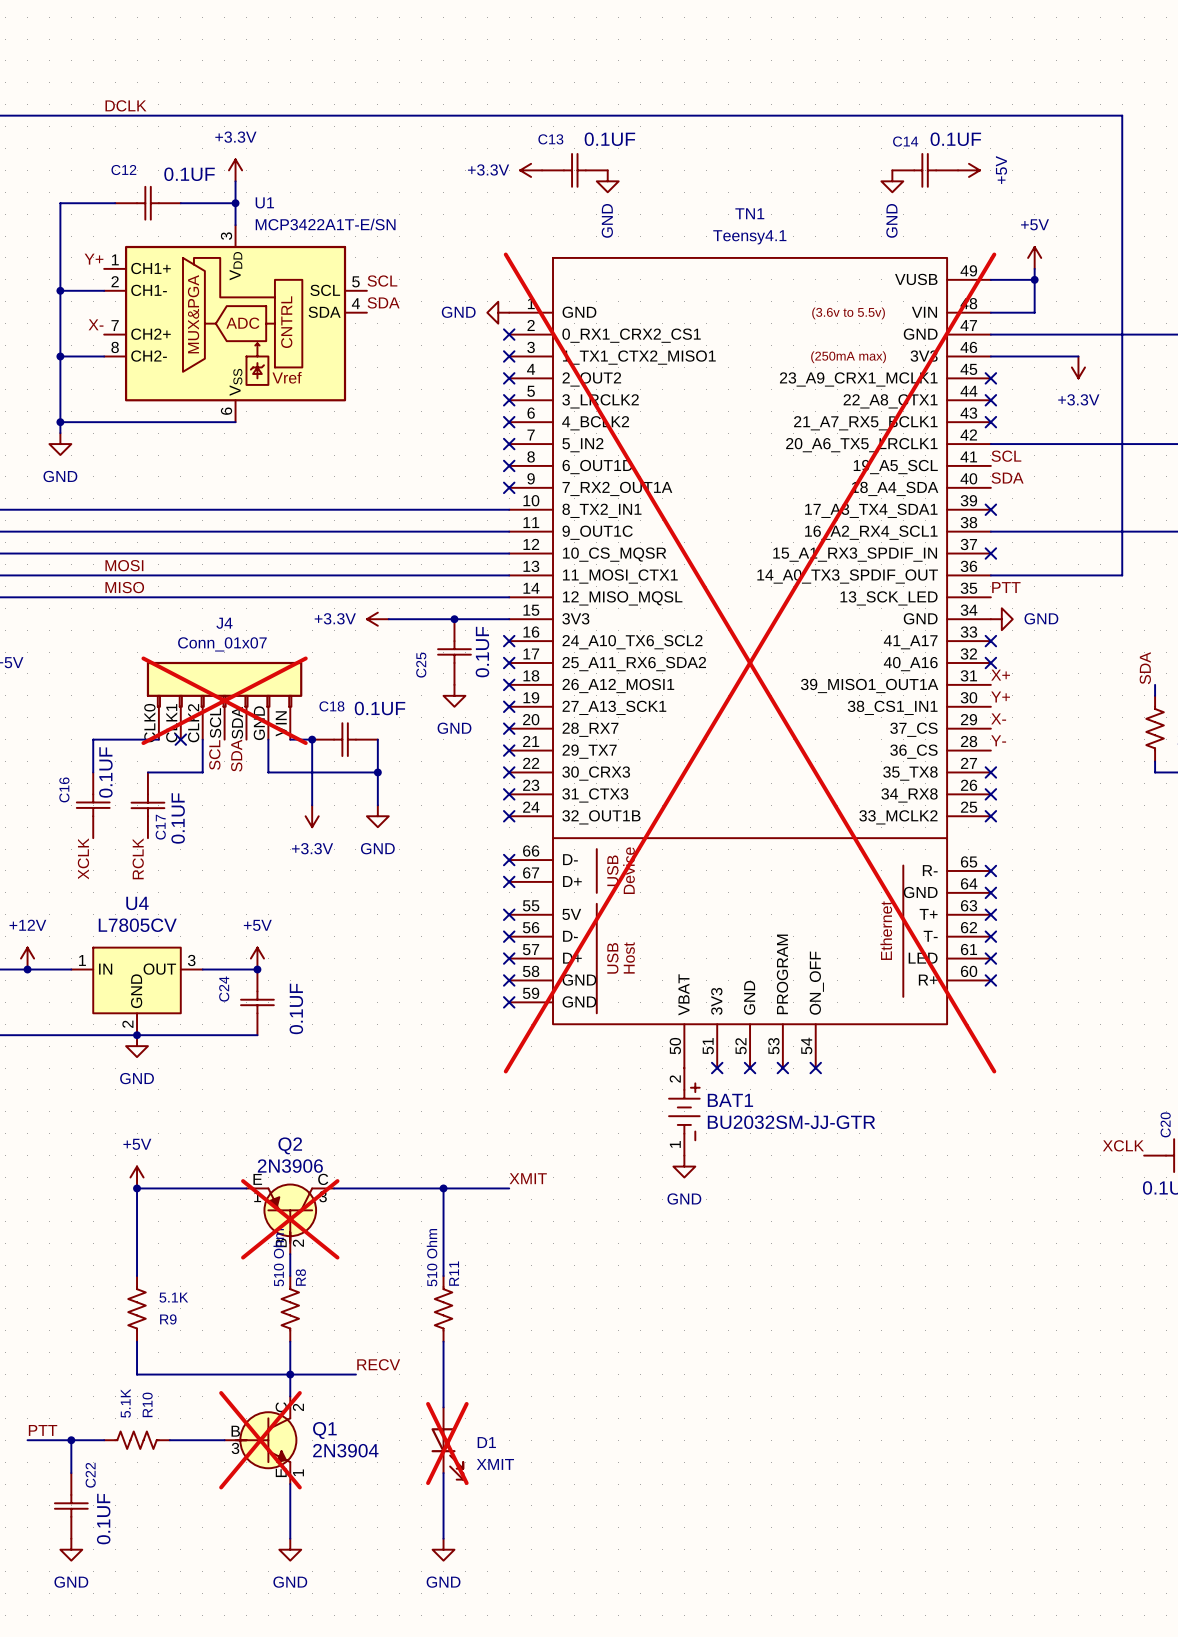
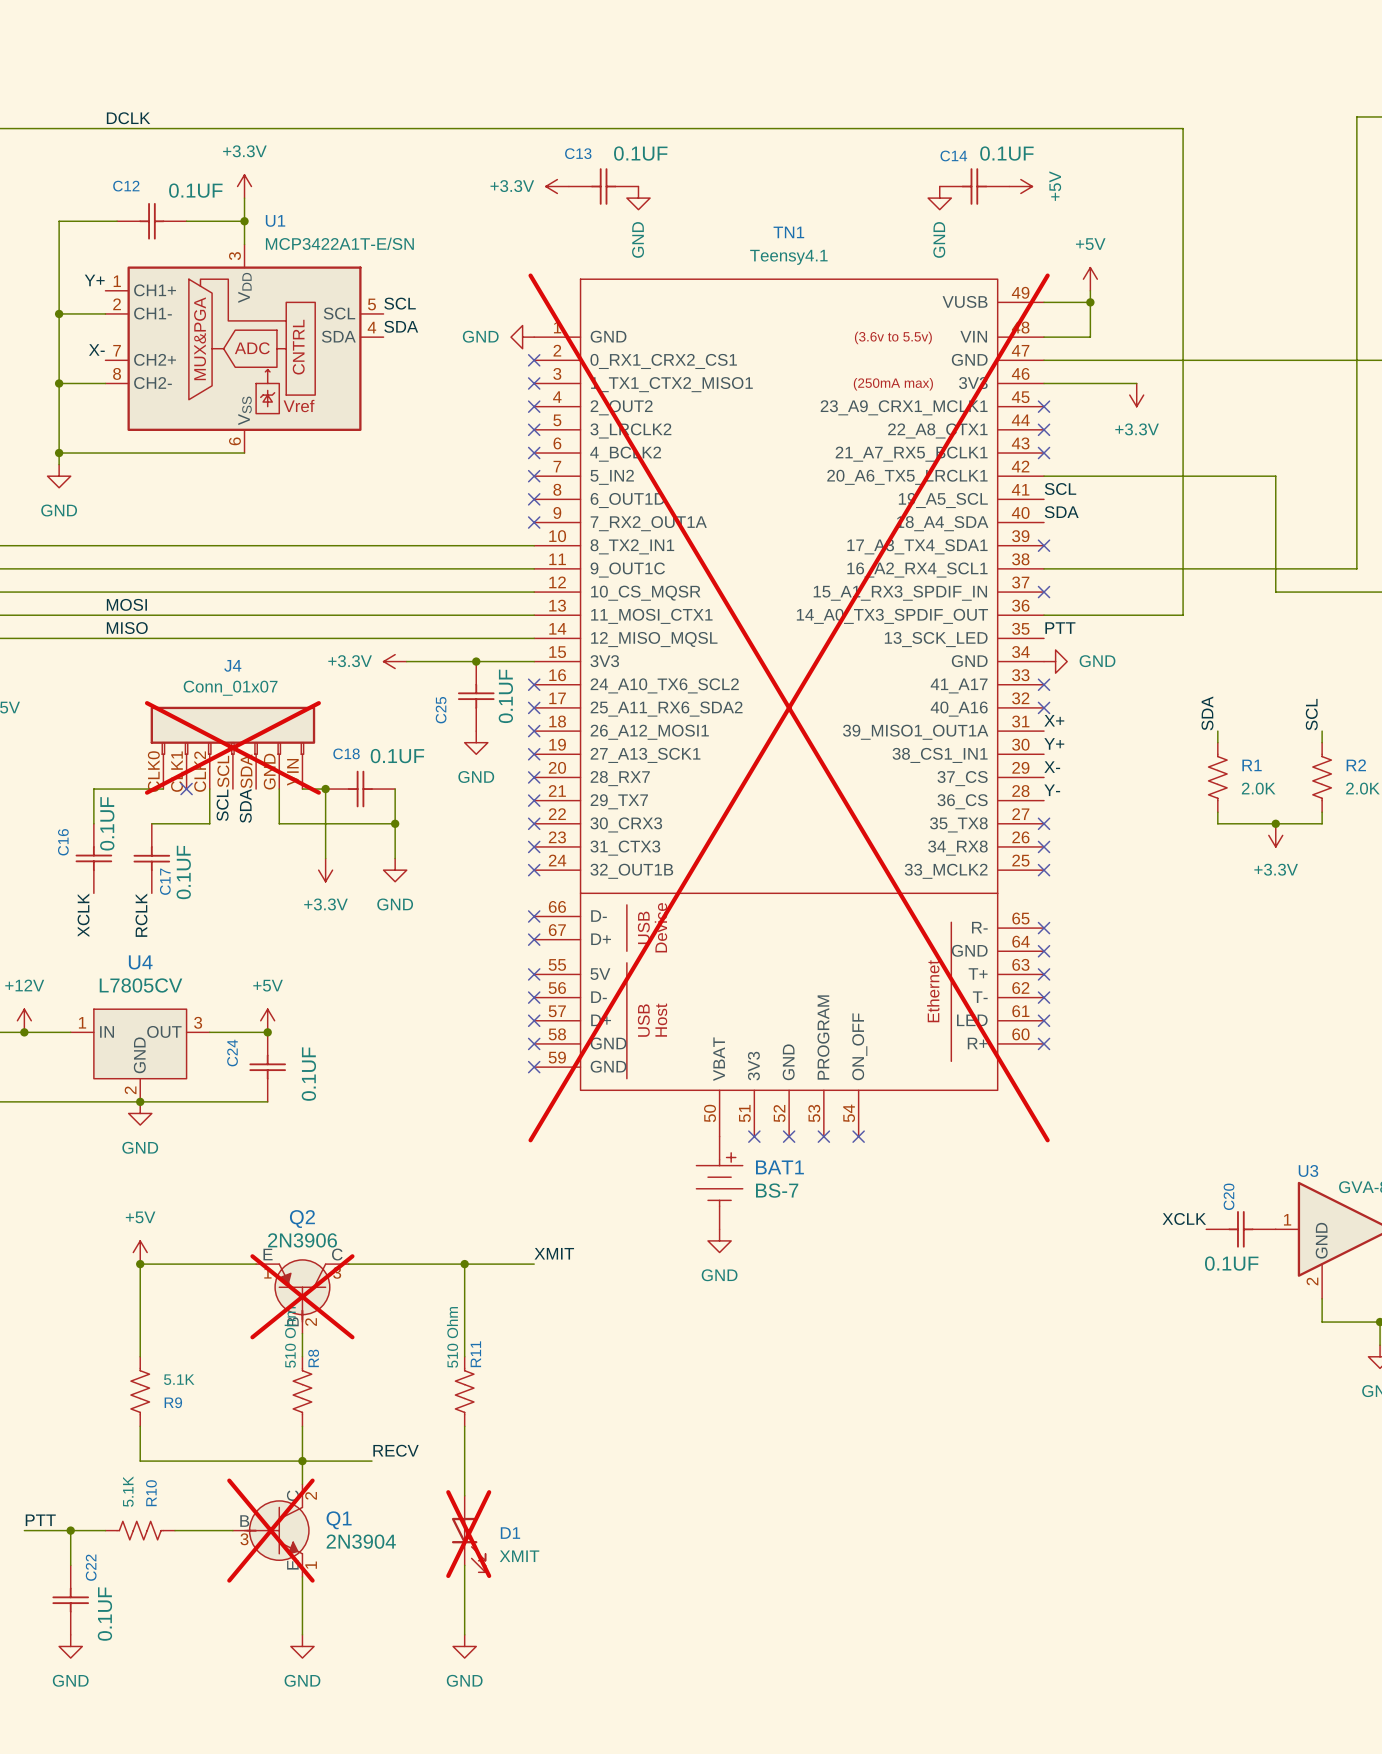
BAT1 symbol: [668, 1068, 701, 1156] -> [696, 1136, 743, 1230]
BAT1 value: BU2032SM-JJ-GTR (791, 1122) -> BS-7 (777, 1190)

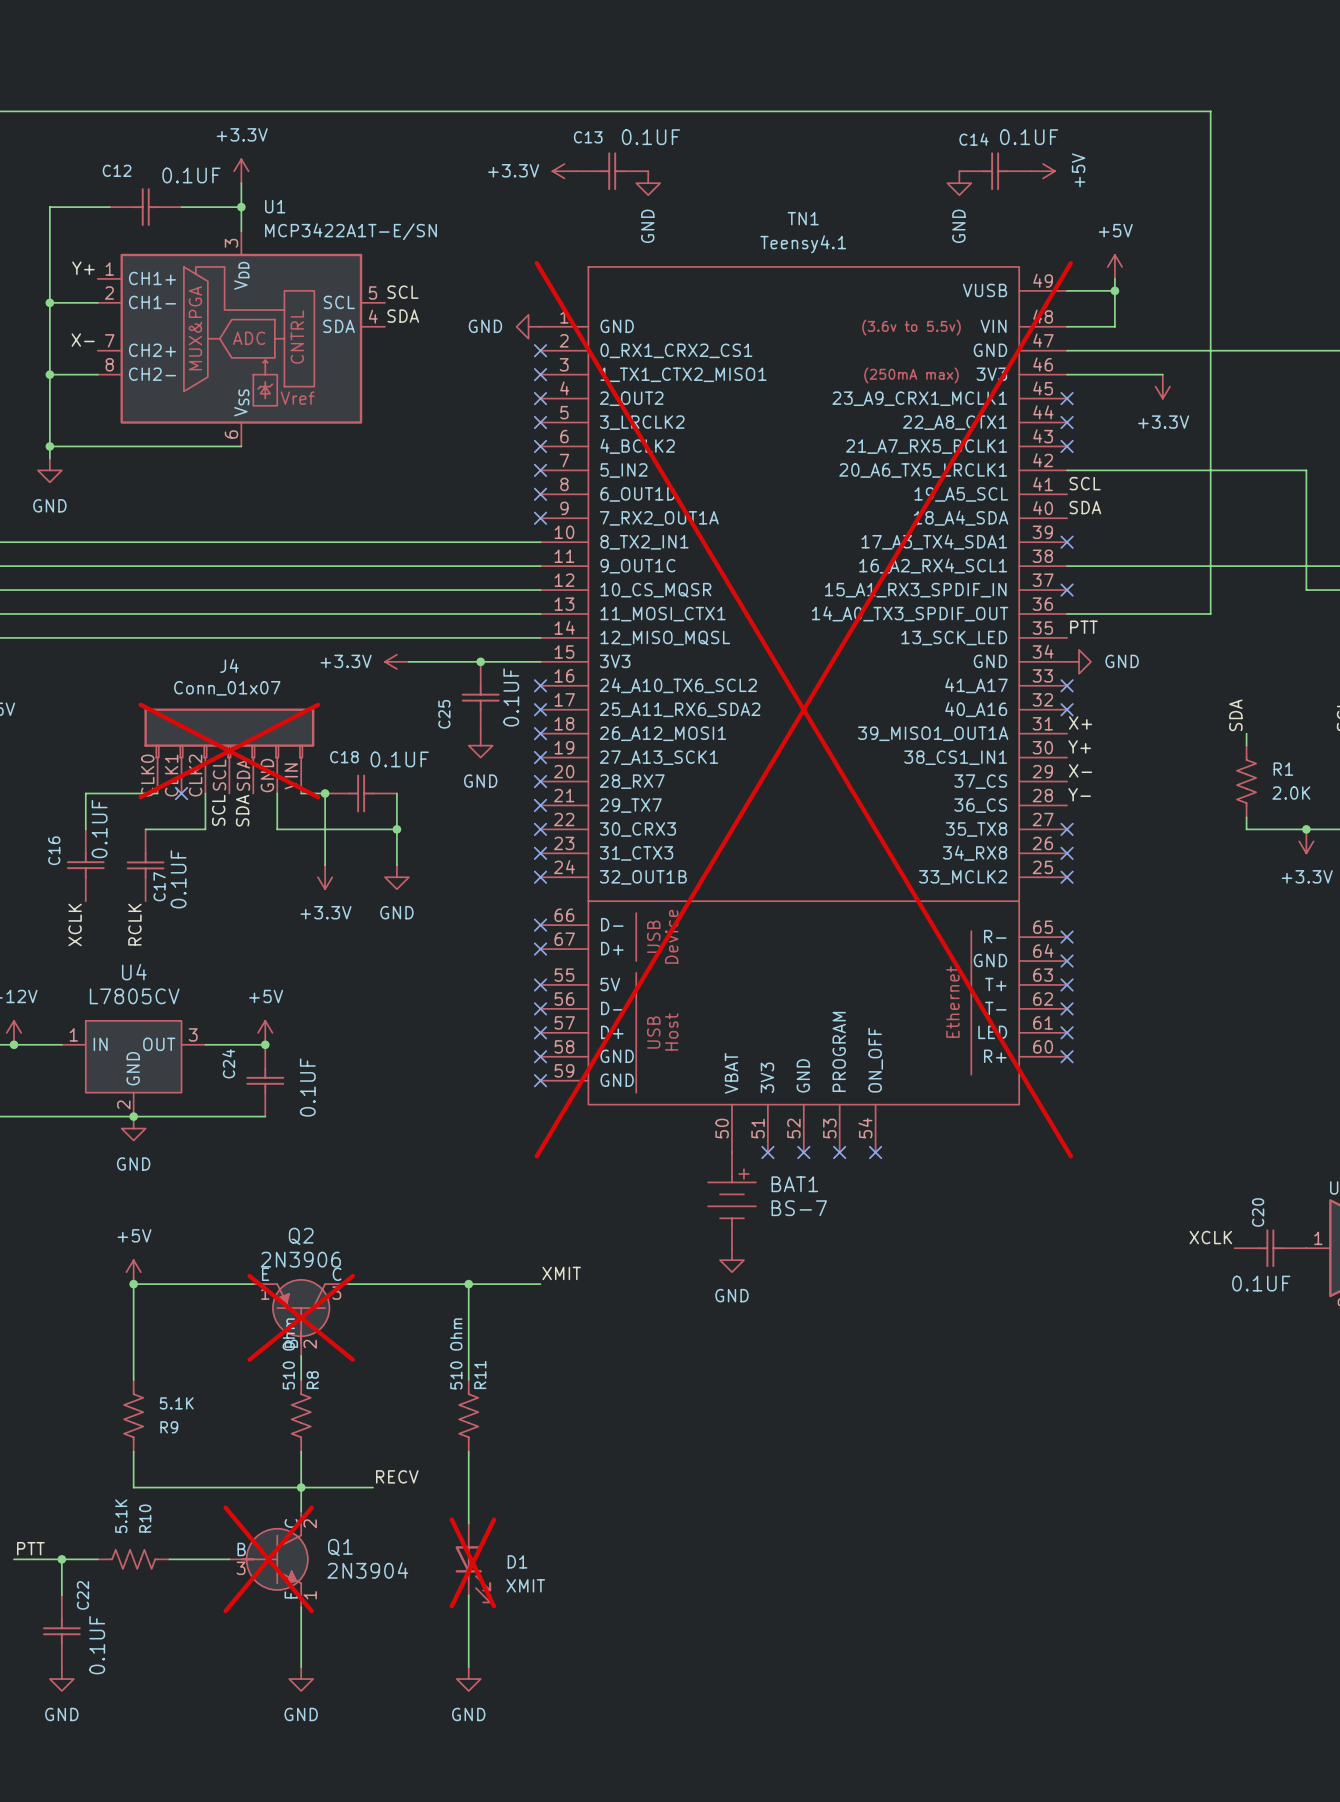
label: DCLK (128, 118) -> none
label: MOSI (126, 604) -> none
label: MISO (127, 628) -> none

